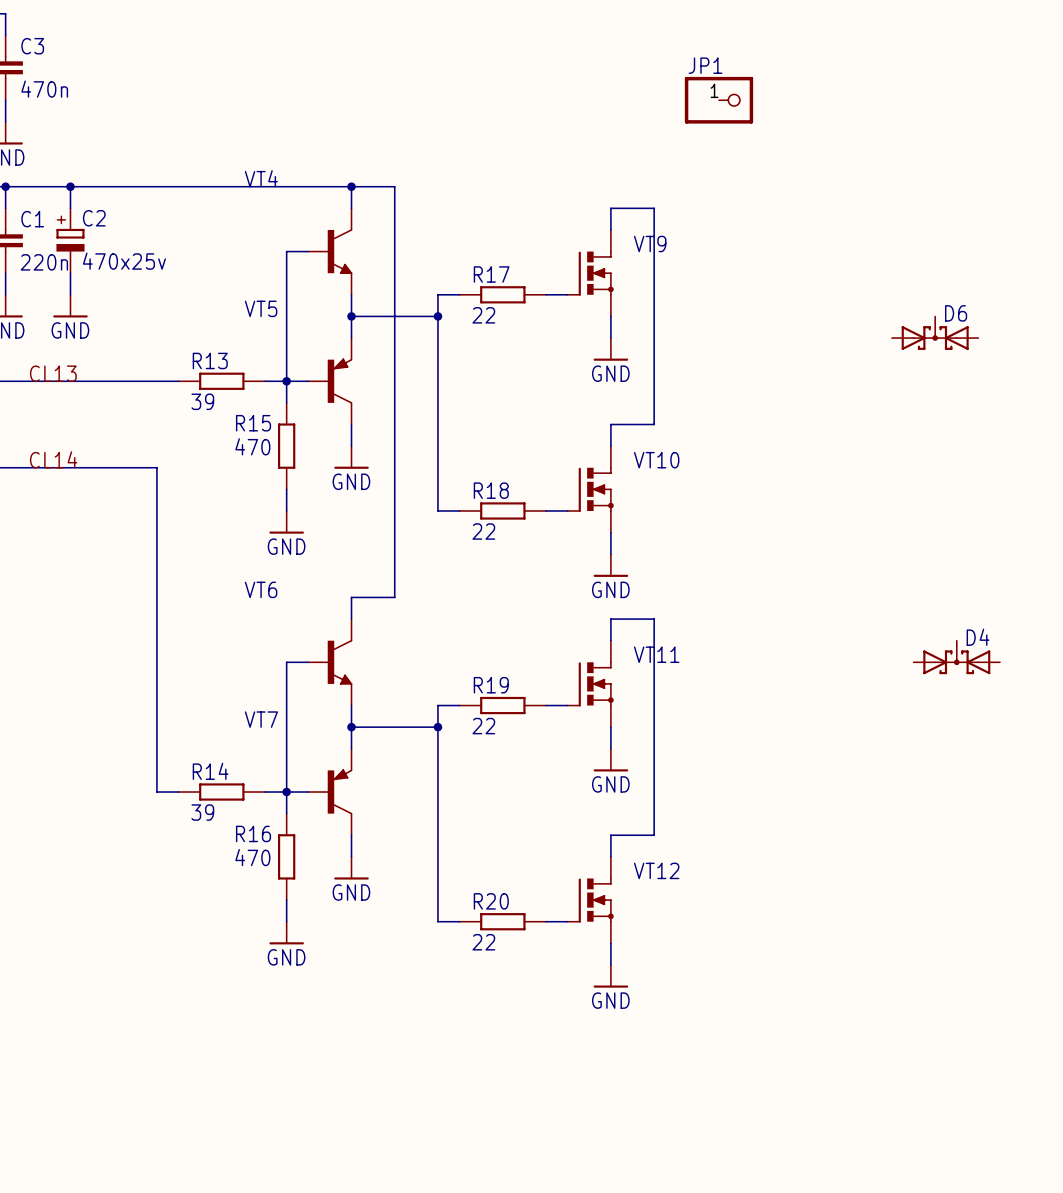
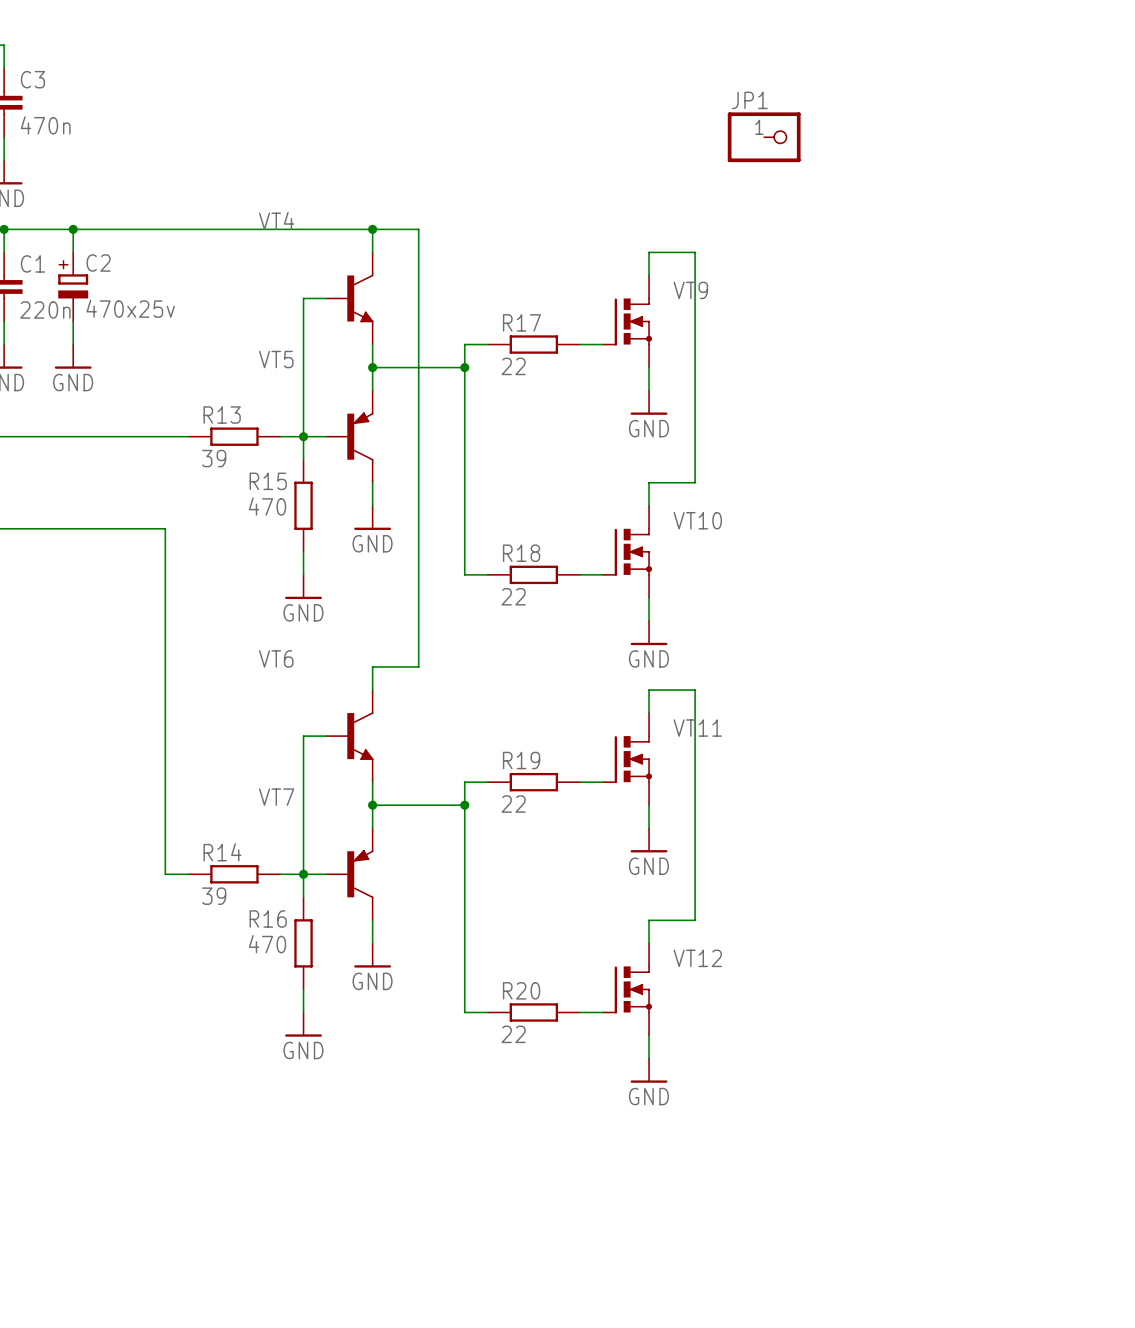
D6: (935, 333) -> none
label: CL13 (53, 373) -> none
label: CL14 (53, 459) -> none
D4: (956, 657) -> none

